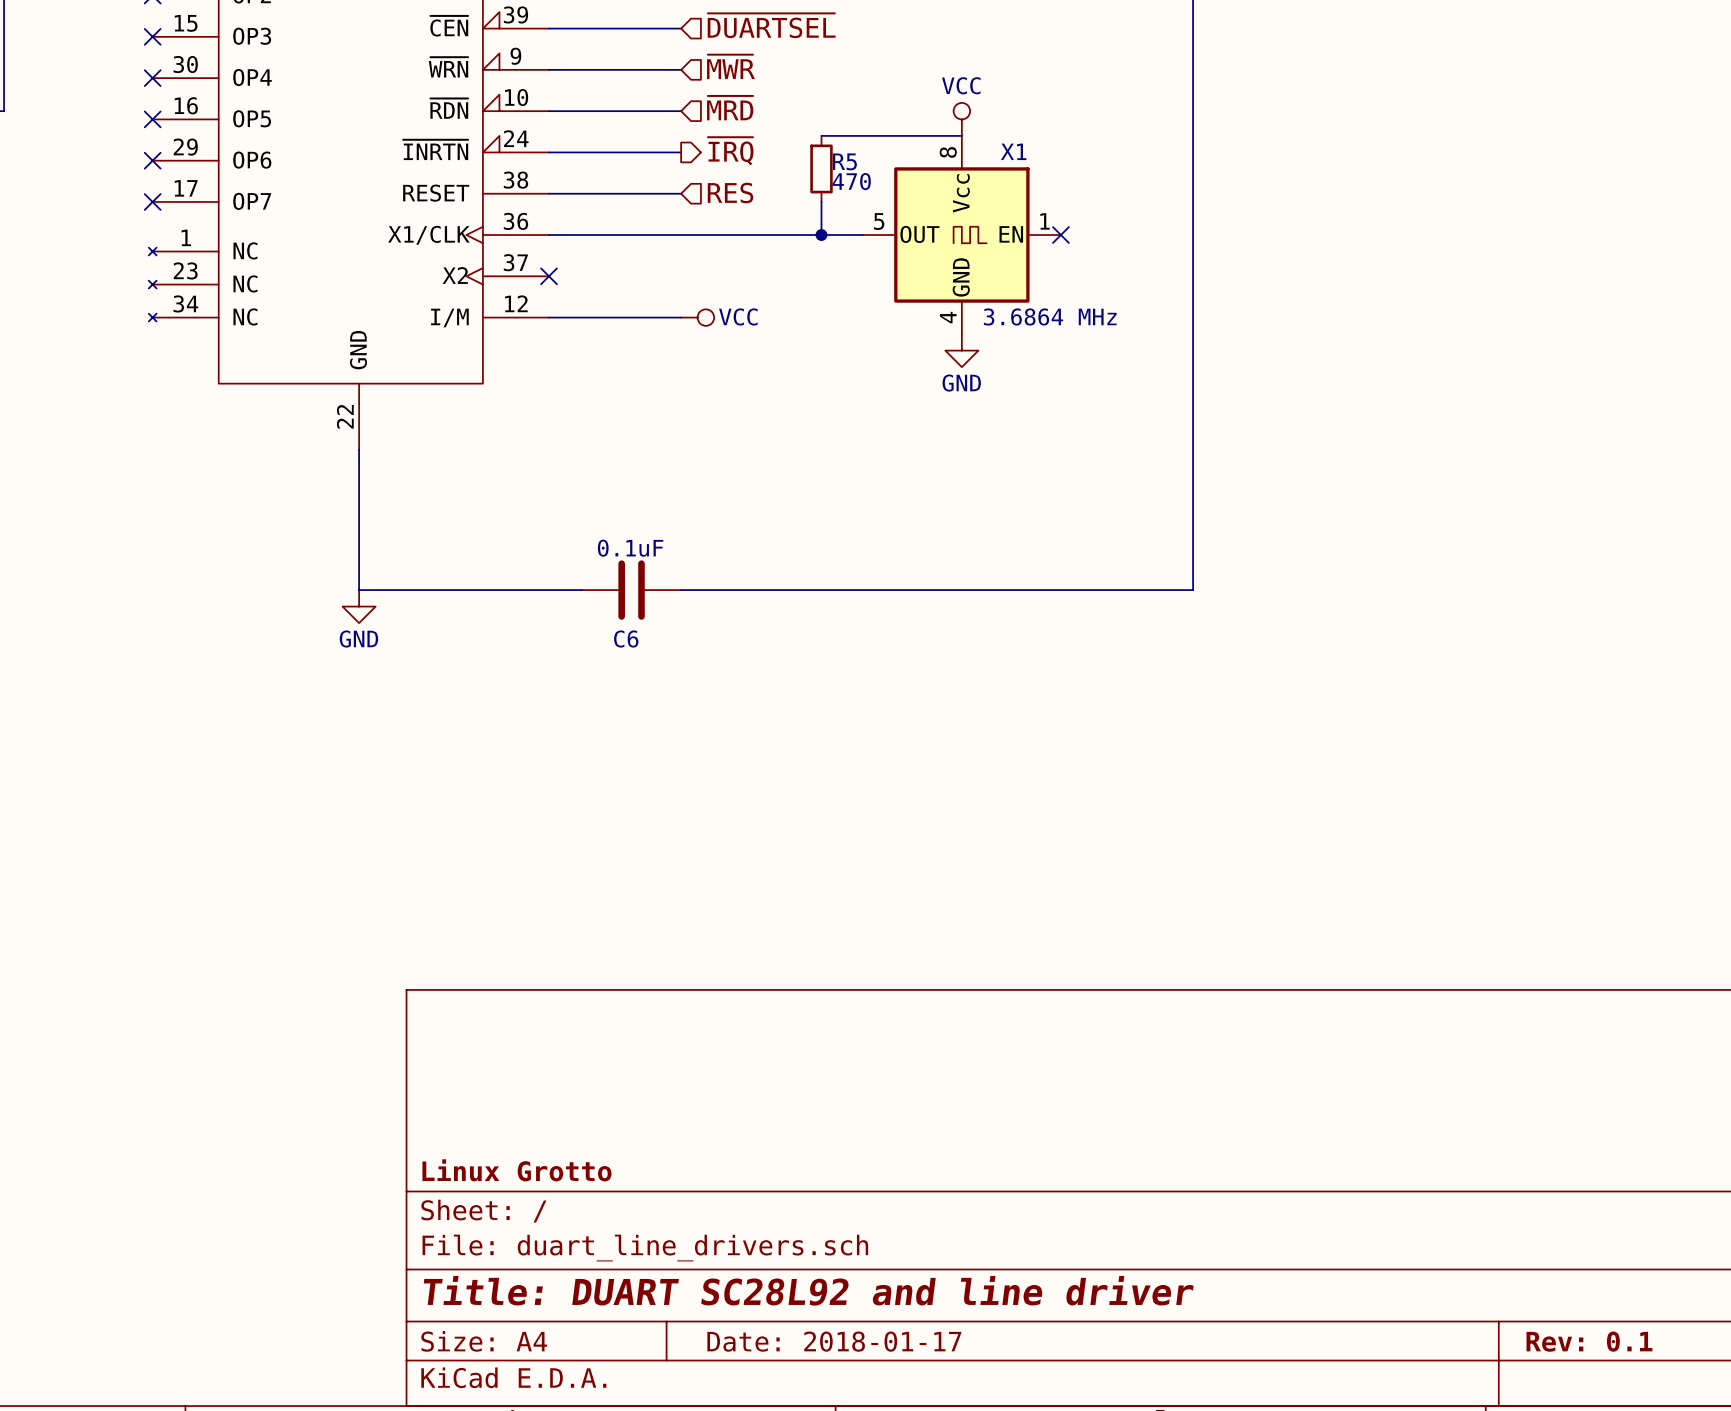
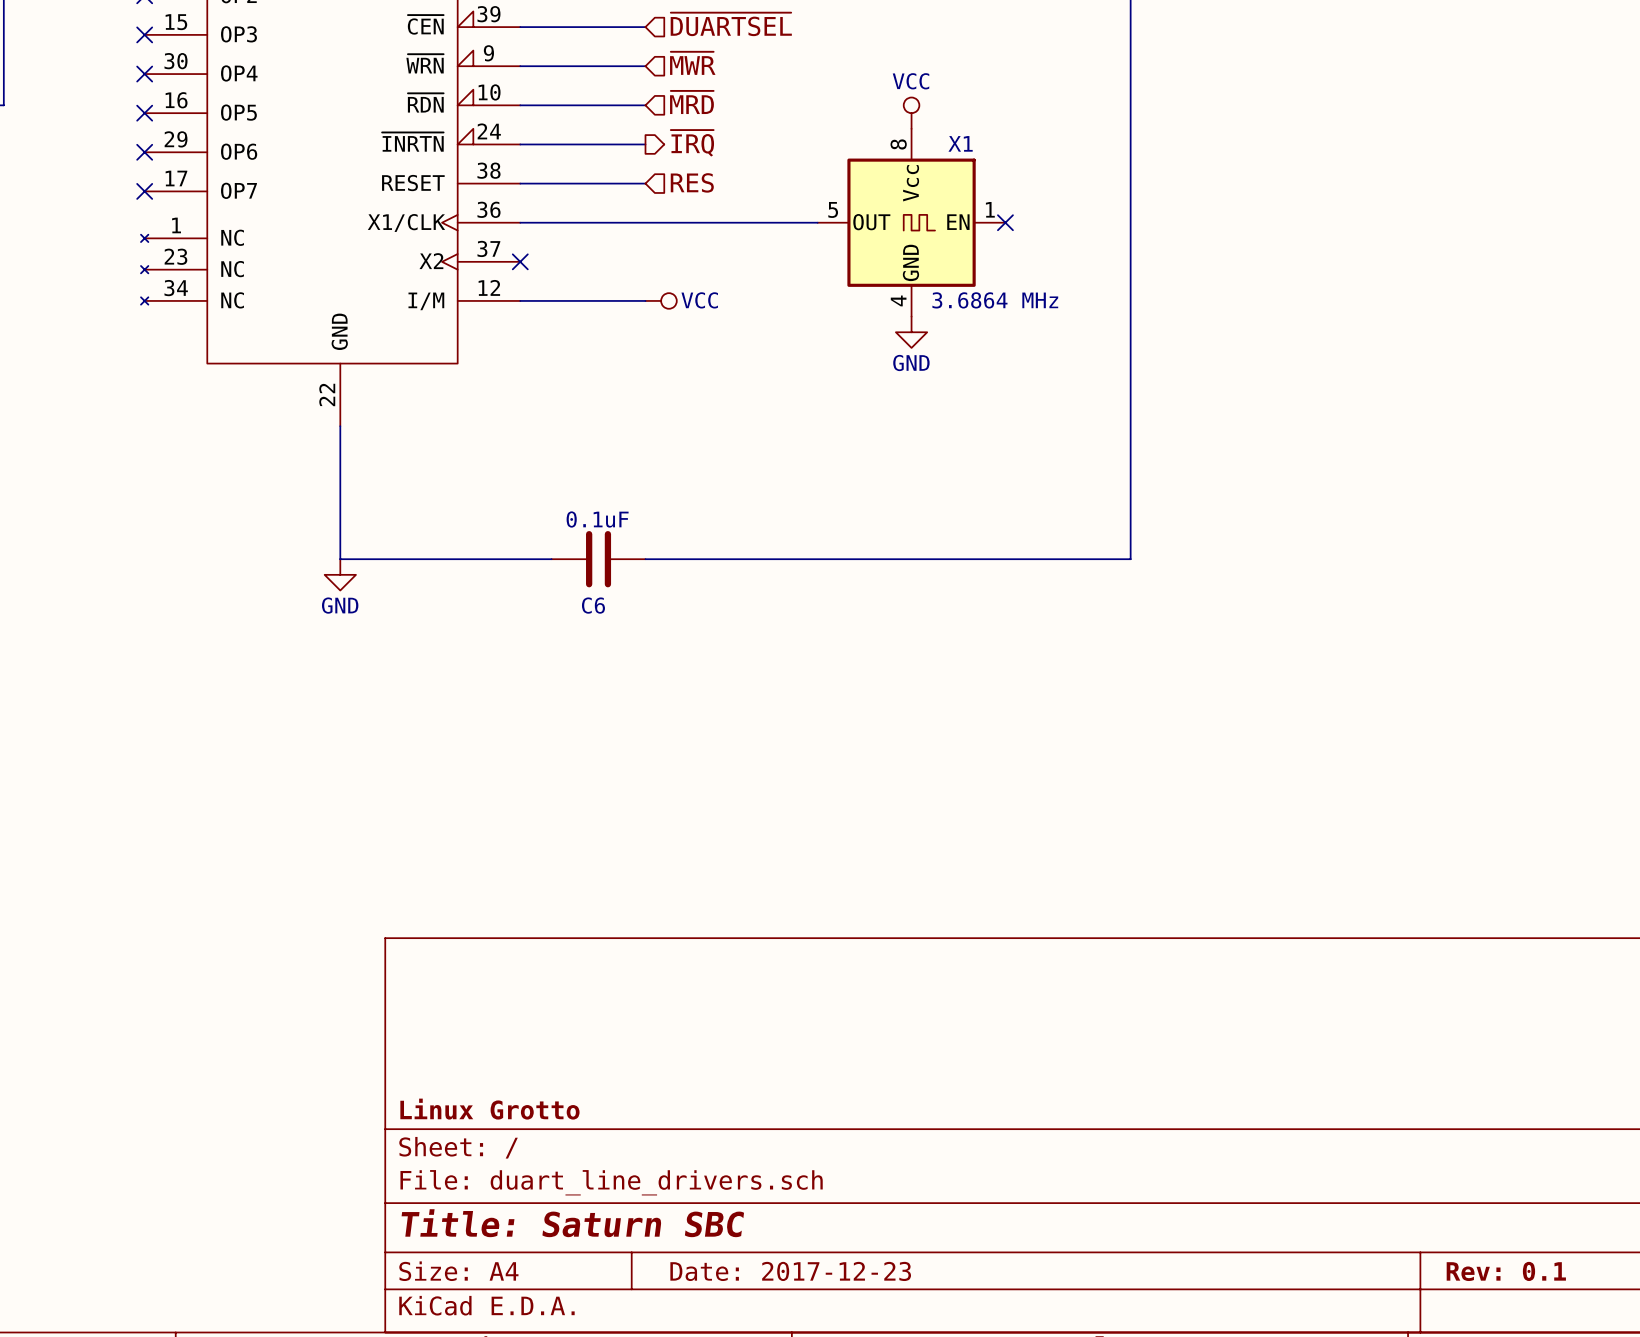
wire: (821, 135) (961, 135) -> none
R5: 470 (821, 168) -> none
wire: (821, 201) (821, 235) -> none
junction: (821, 235) -> none
title block: Title: DUART SC28L92 and line driver (808, 1290) -> Title: Saturn SBC (572, 1223)
title block: Date: 2018-01-17 (834, 1341) -> Date: 2017-12-23 (790, 1271)

